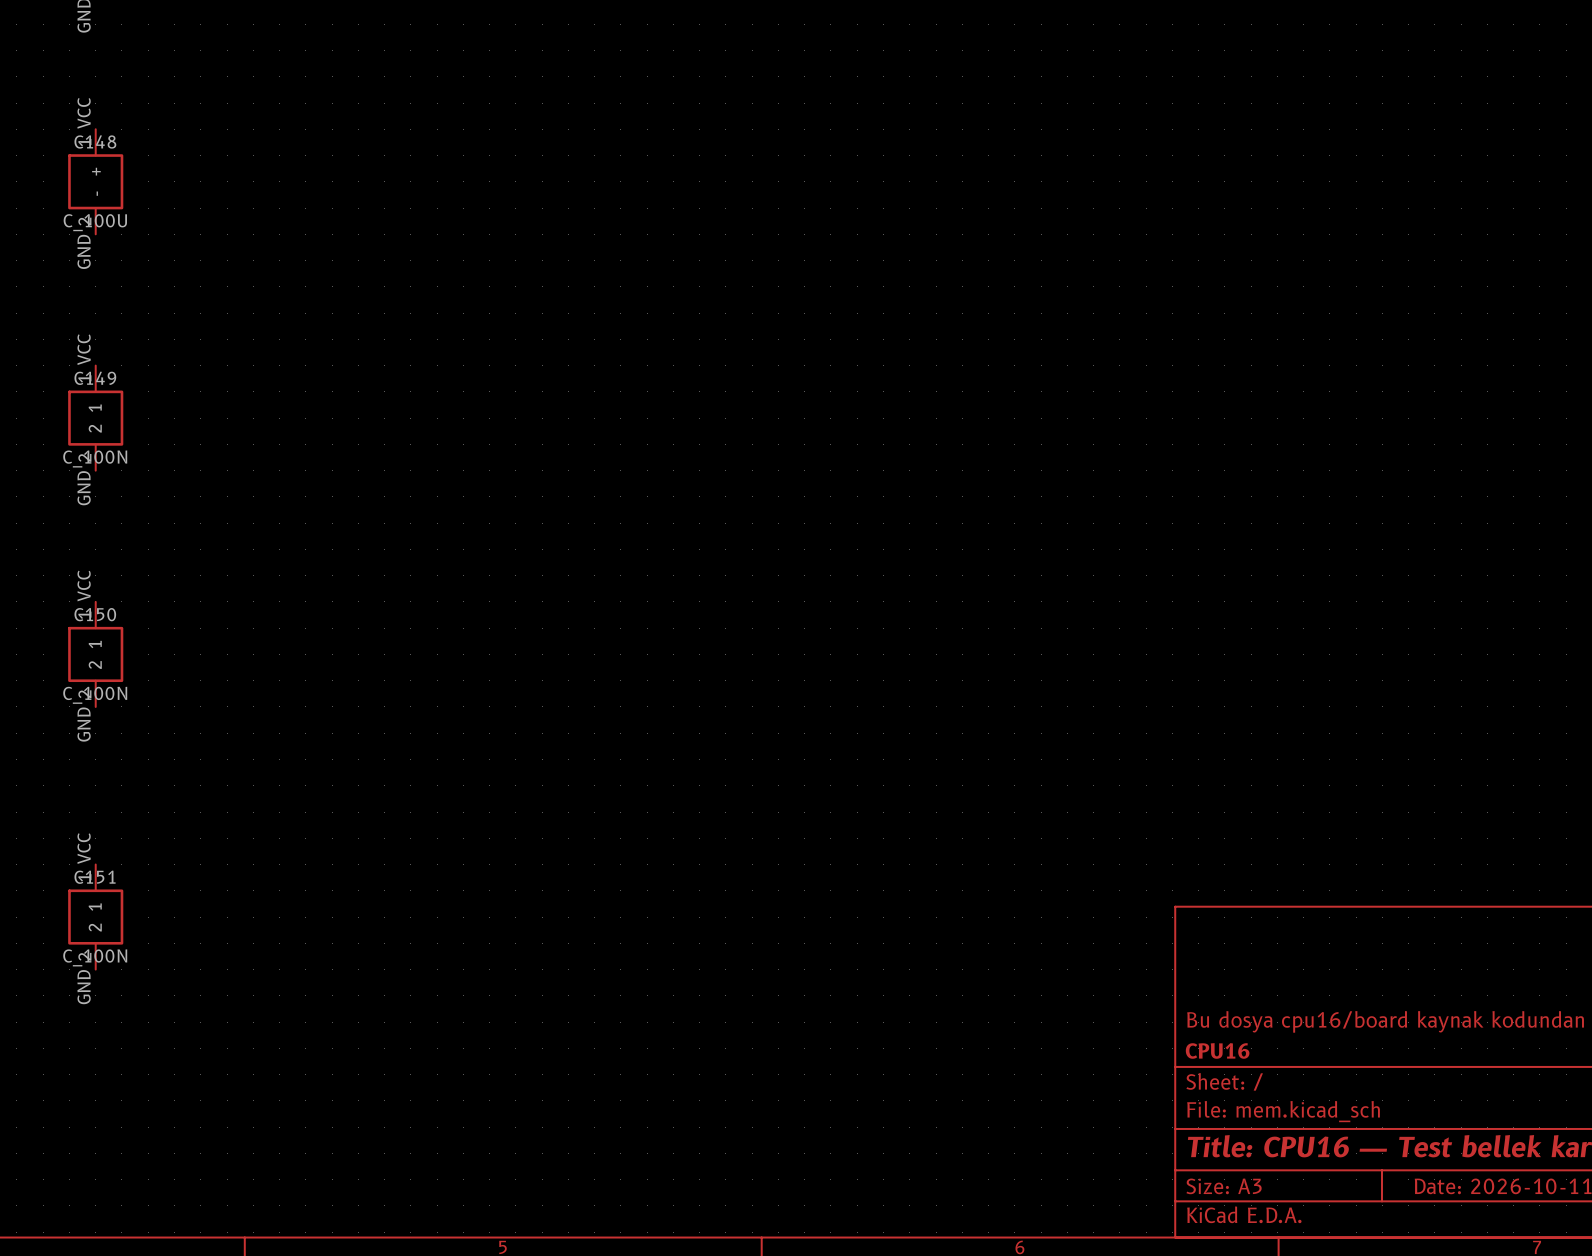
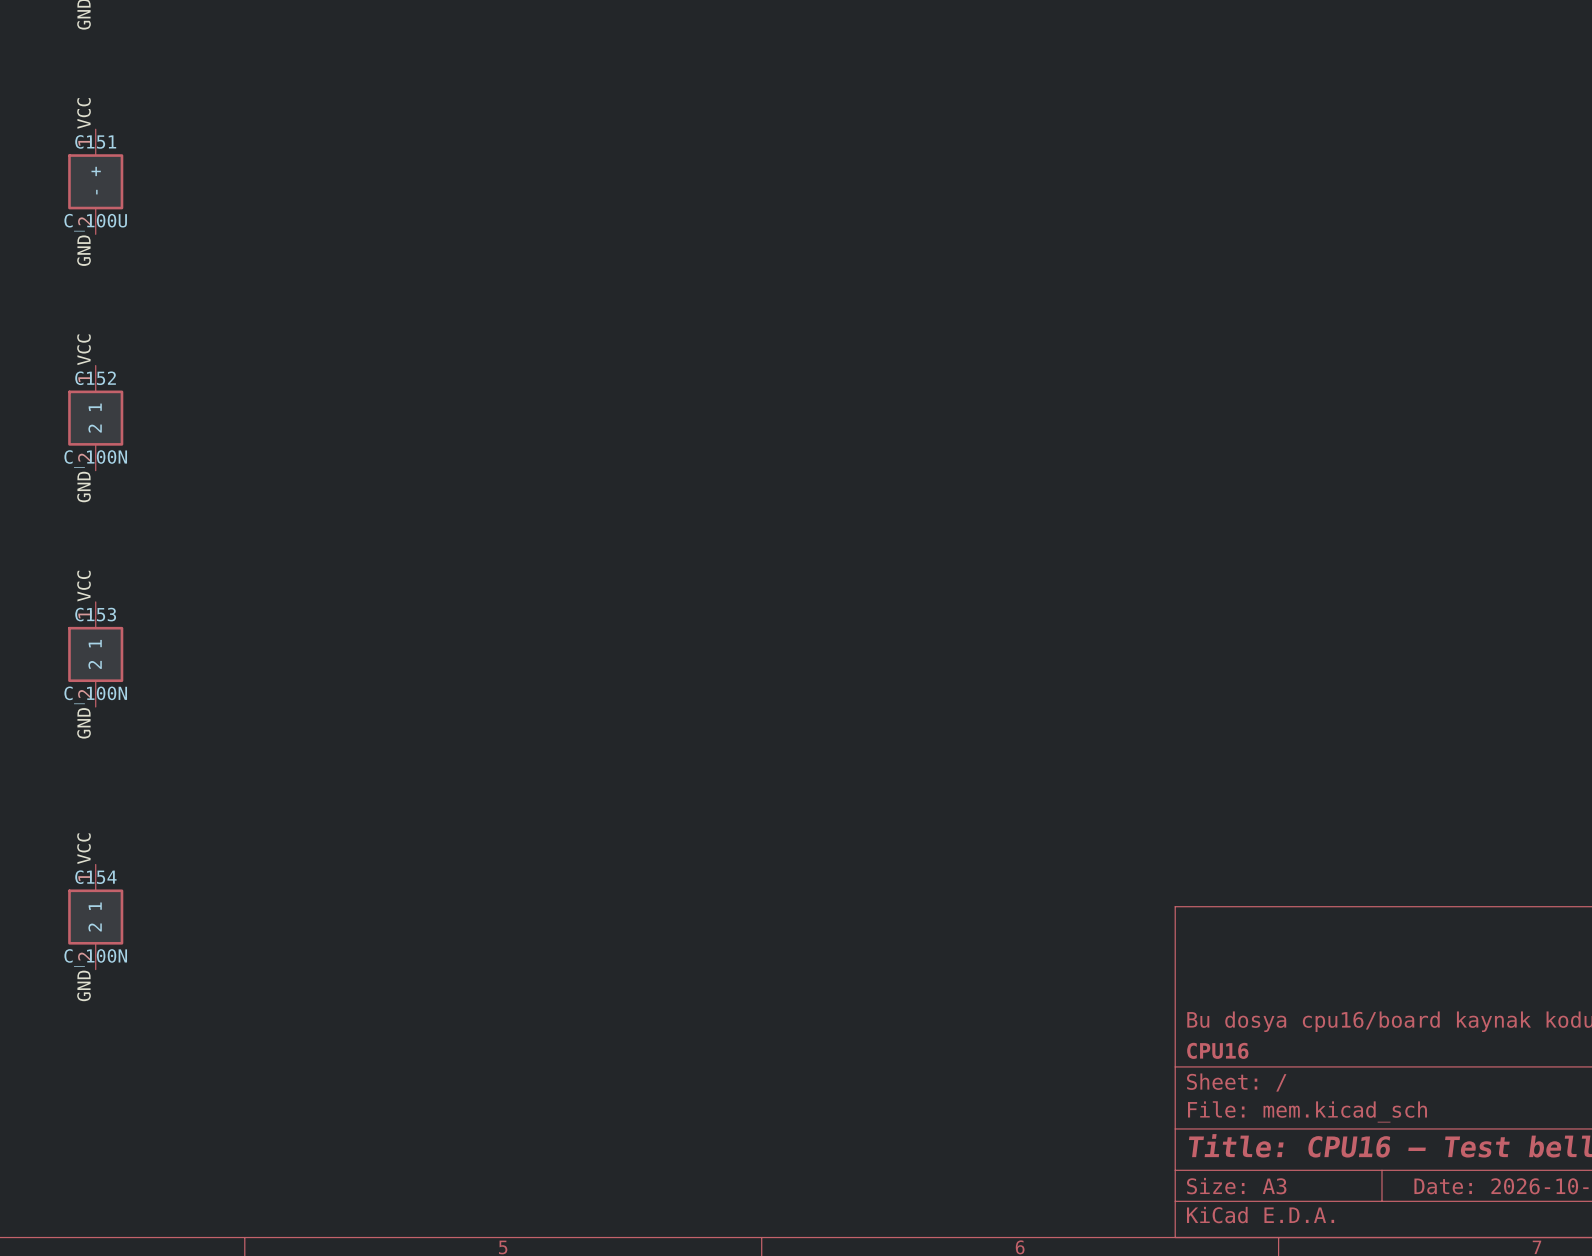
C148 name: C148 (95, 141) -> C151 (95, 141)
C149 name: C149 (95, 378) -> C152 (95, 378)
C150 name: C150 (95, 614) -> C153 (95, 614)
C151 name: C151 (95, 877) -> C154 (95, 877)

